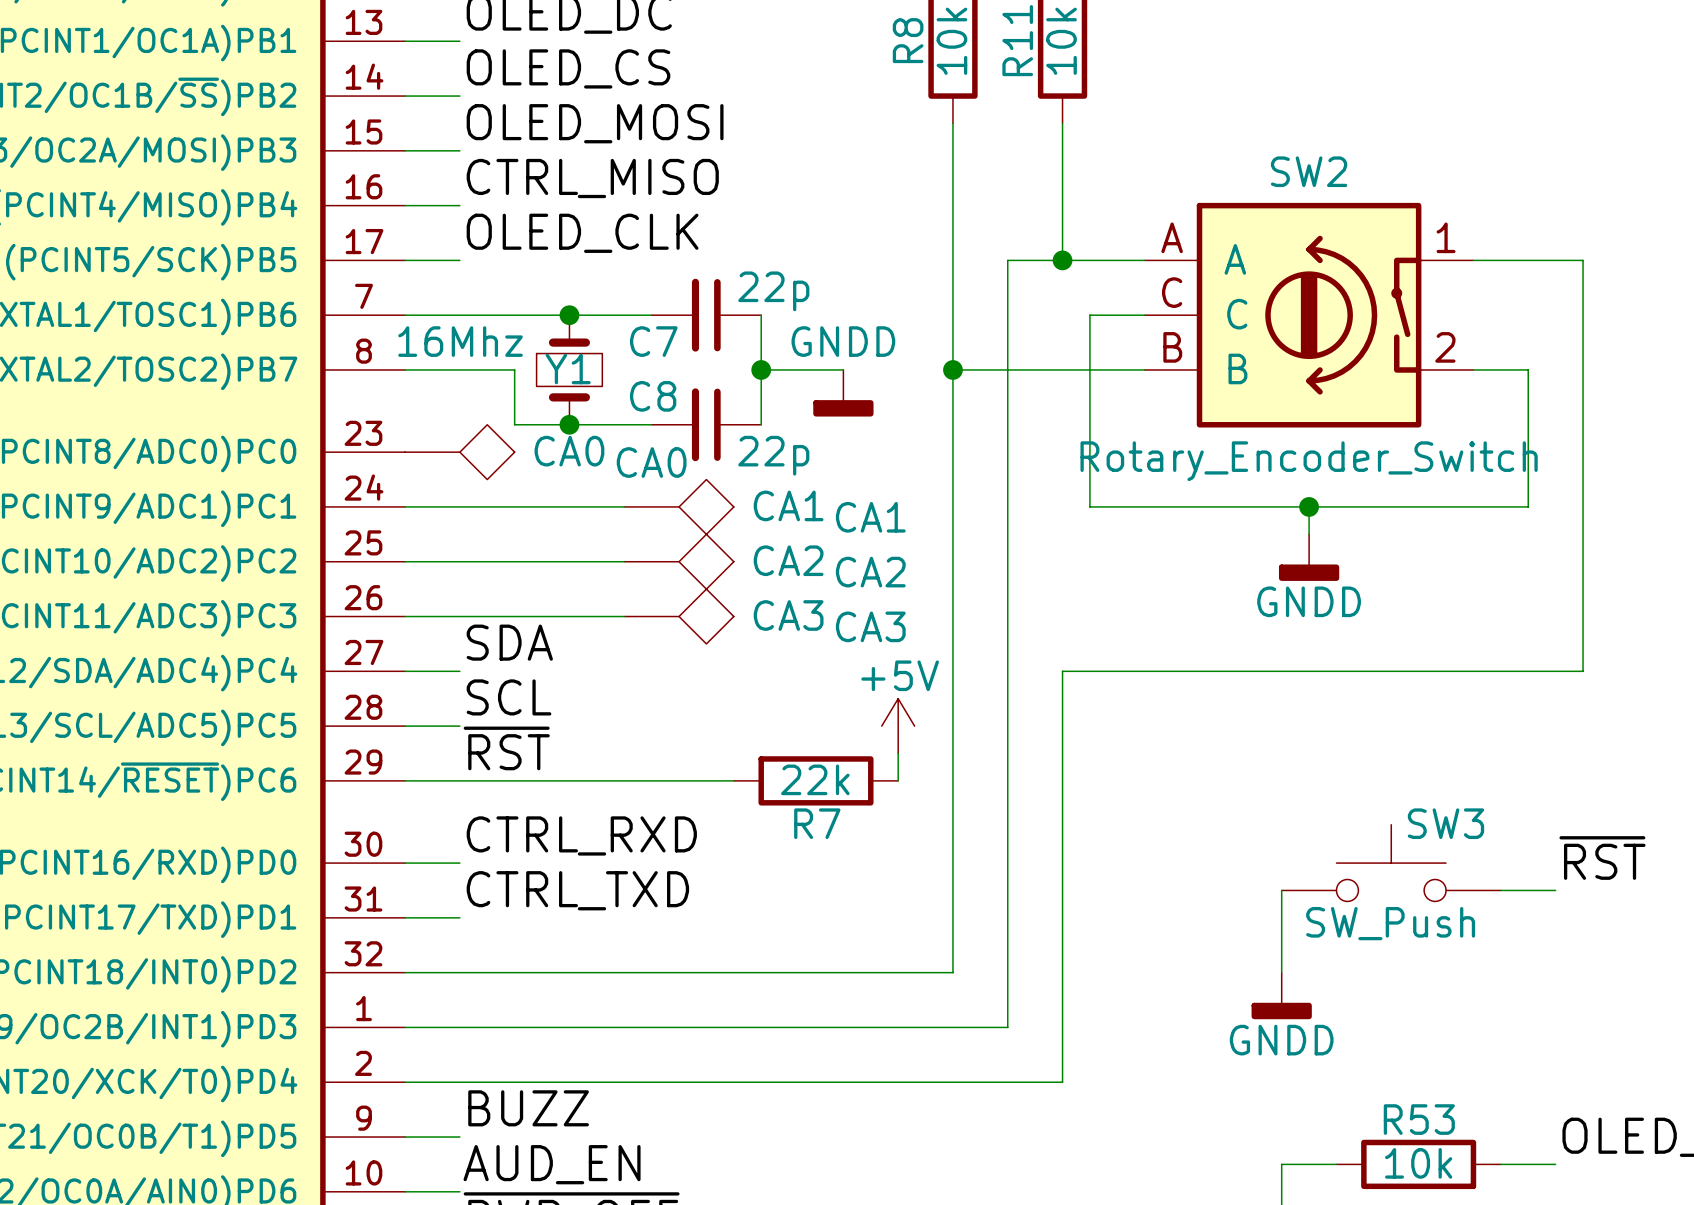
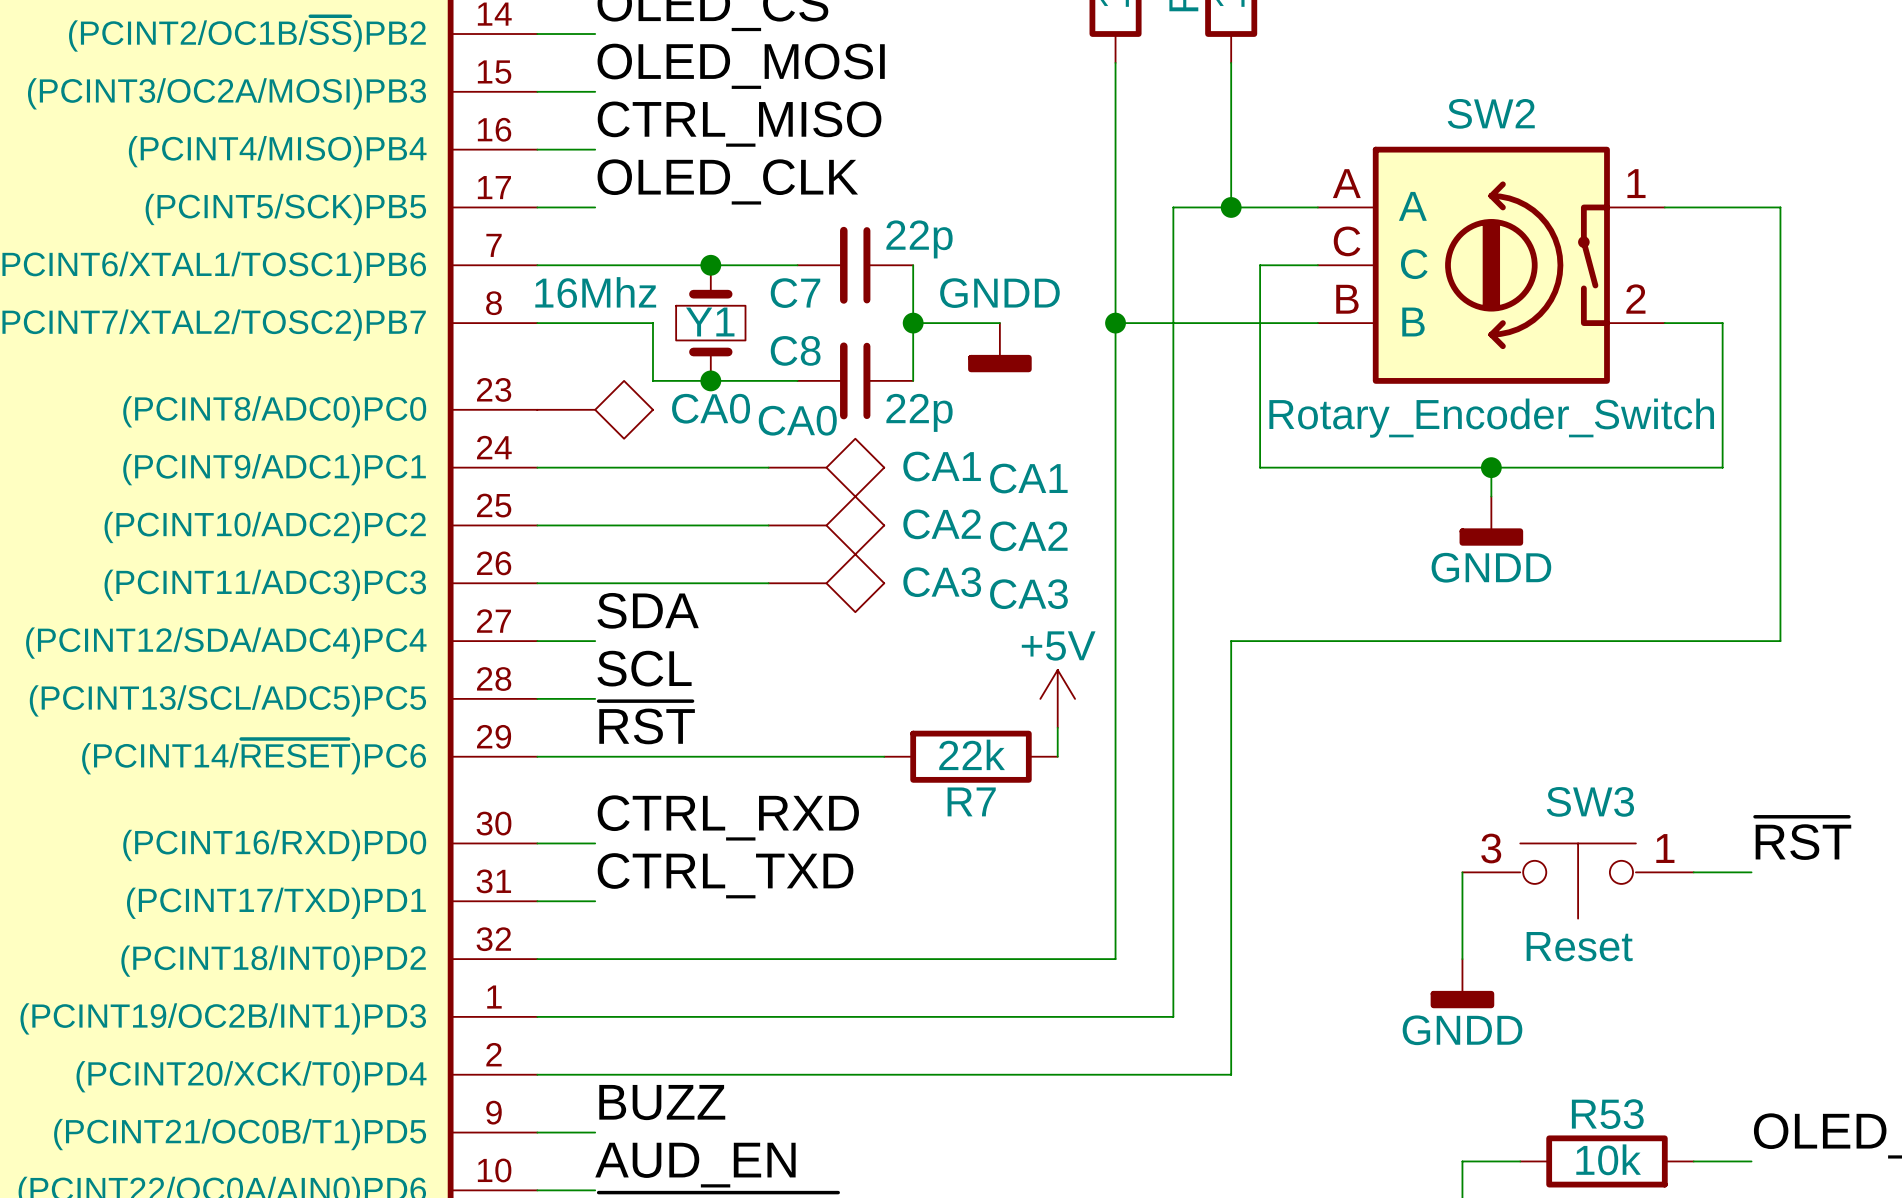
SW3 name position: SW3 (1445, 823) -> SW3 (1590, 801)
SW3 symbol: [1281, 824, 1501, 902] -> [1462, 843, 1694, 919]
SW3 value: SW_Push (1390, 923) -> Reset (1579, 946)

